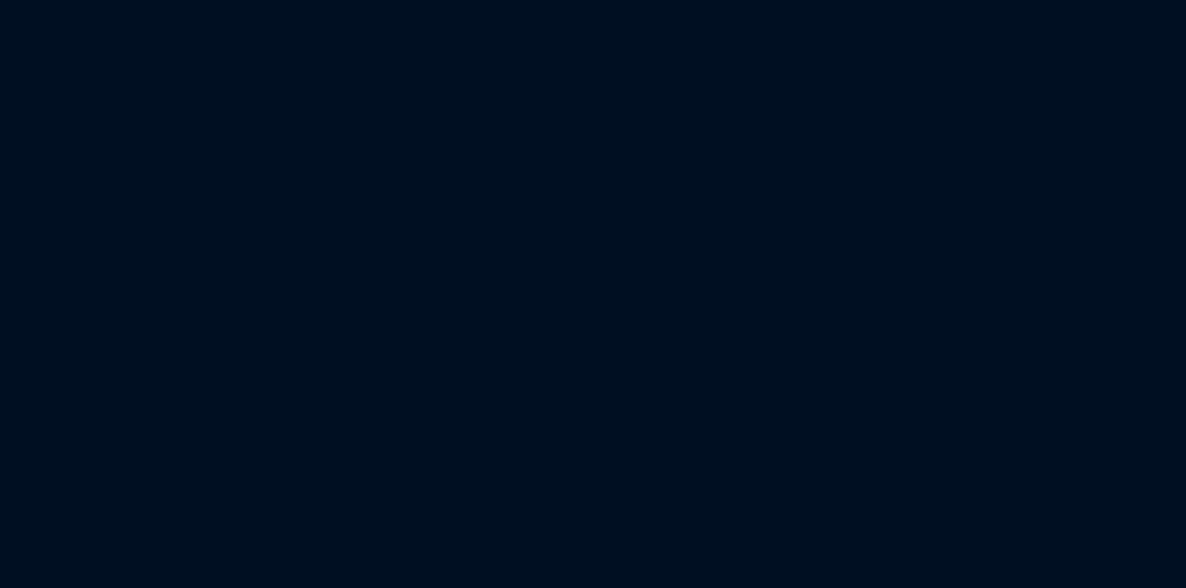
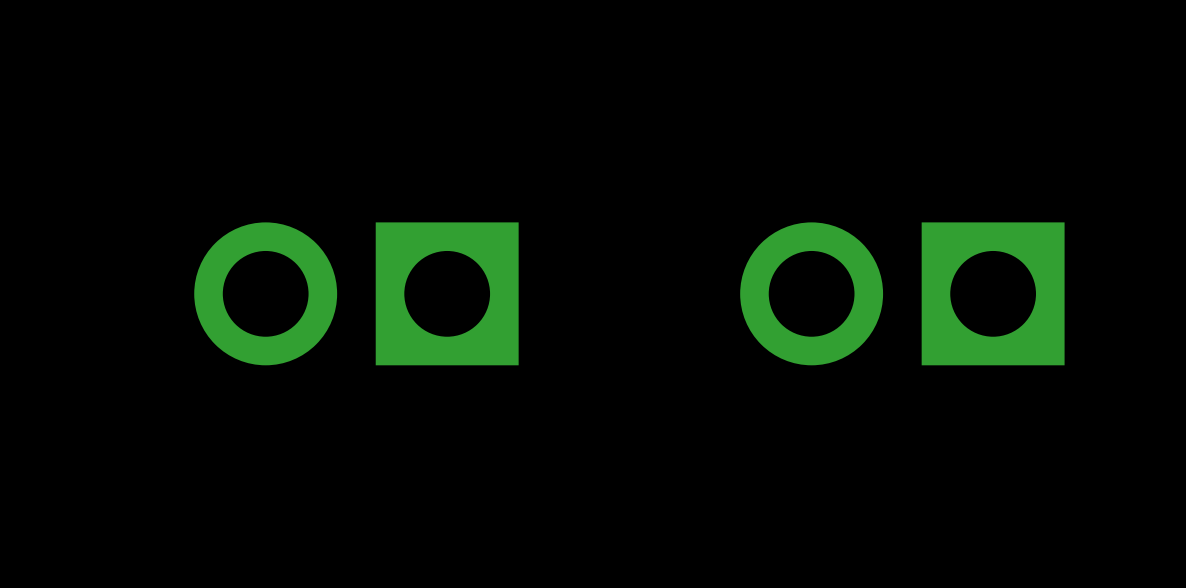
part: none -> (356, 293)
part: none -> (902, 293)

